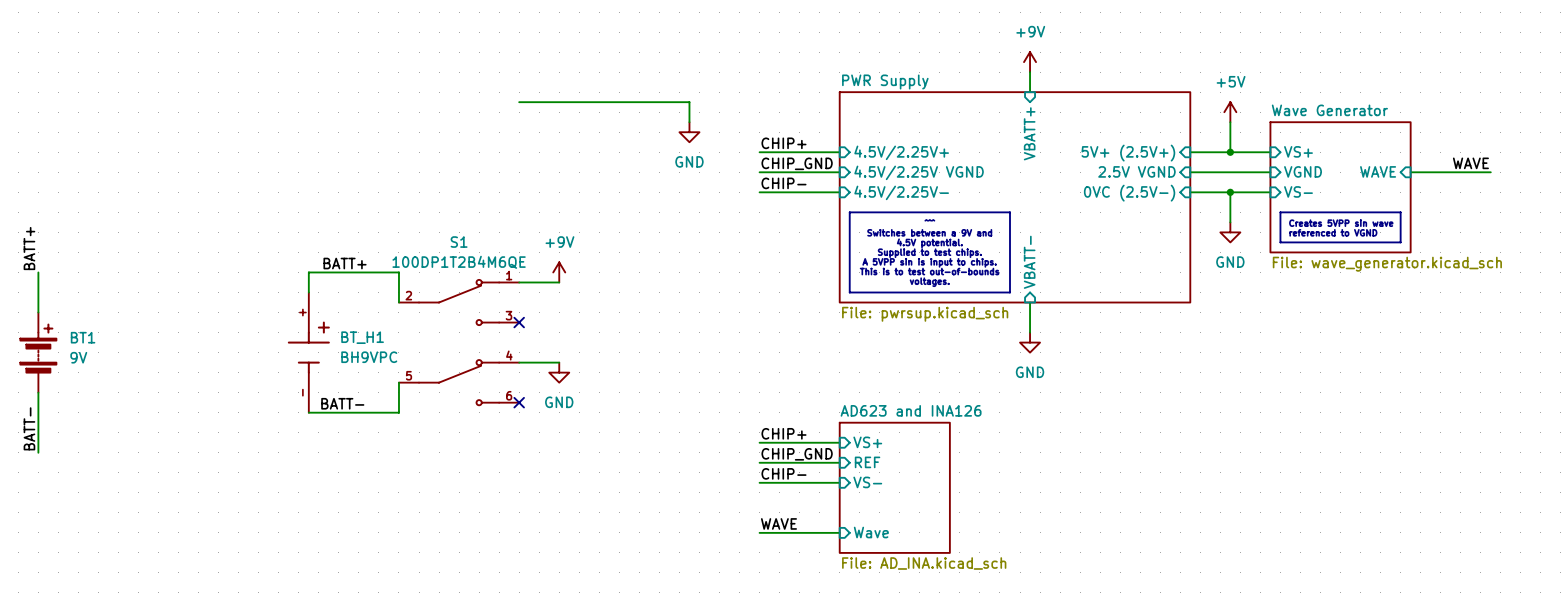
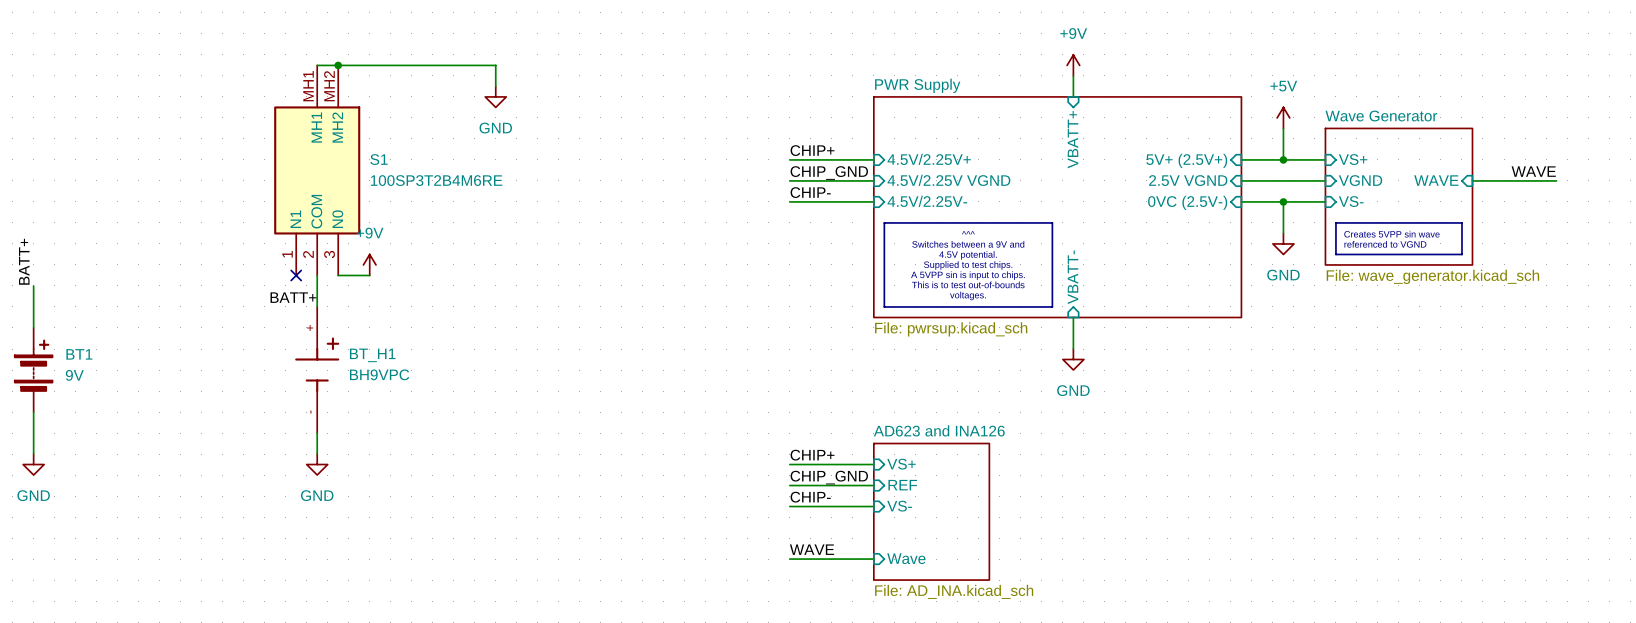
wire: none -> (317, 65) (495, 65) (495, 86)
junction: none -> (338, 65)
power symbol: none -> GND (495, 96)
wire: (519, 102) (689, 102) (689, 122) -> none
power symbol: GND (689, 132) -> none
S1 name position: S1 (459, 242) -> S1 (379, 159)
power symbol: none -> +9V (369, 264)
no-connect mark: none -> (296, 275)
wire: none -> (338, 275) (369, 275)
S1 value: 100DP1T2B4M6QE (459, 262) -> 100SP3T2B4M6RE (436, 180)
label position: BATT+ (345, 263) -> BATT+ (293, 297)
wire: (308, 272) (398, 272) (398, 302) -> (317, 285) (317, 275)
power symbol: +9V (559, 272) -> none
S1 symbol: [398, 279, 520, 406] -> [274, 65, 361, 276]
wire: (519, 282) (559, 282) -> none
no-connect mark: (519, 322) -> none
wire: (519, 362) (559, 362) -> none
power symbol: GND (559, 372) -> none
wire: (398, 382) (398, 412) (308, 412) -> (317, 454) (317, 433)
no-connect mark: (519, 402) -> none
label: BATT- (342, 403) -> none
label: BATT- (29, 428) -> none
power symbol: none -> GND (33, 464)
power symbol: none -> GND (317, 464)

